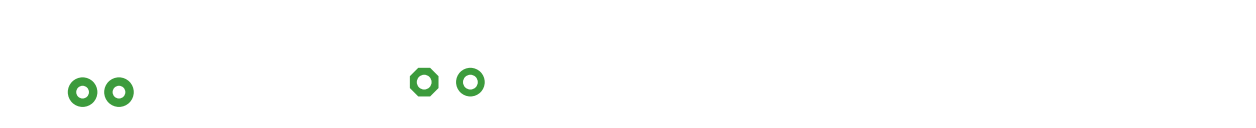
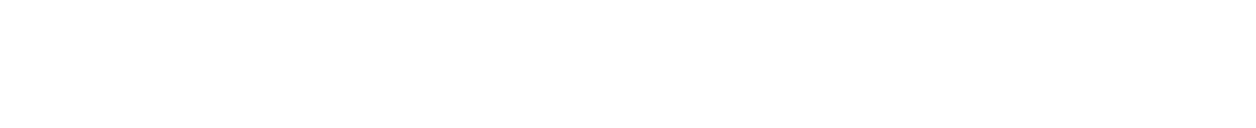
part: (447, 82) -> none
part: (100, 92) -> none

